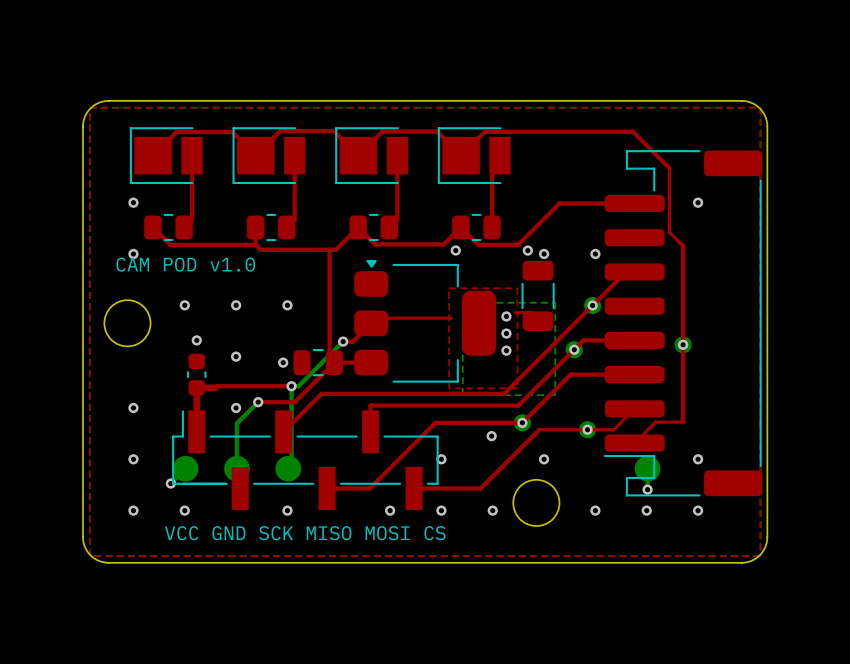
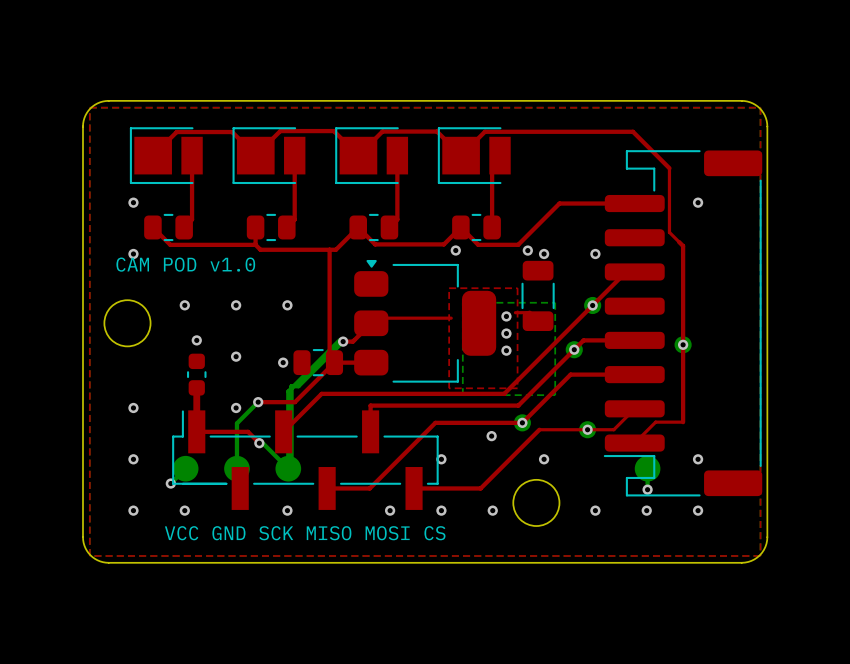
bottom track: none -> (339, 340) (288, 391) (288, 468) (262, 443) (259, 443)
top track: (291, 386) (196, 387) -> none
via position: (291, 386) -> (259, 443)
top track: none -> (196, 431) (248, 431) (259, 443)

